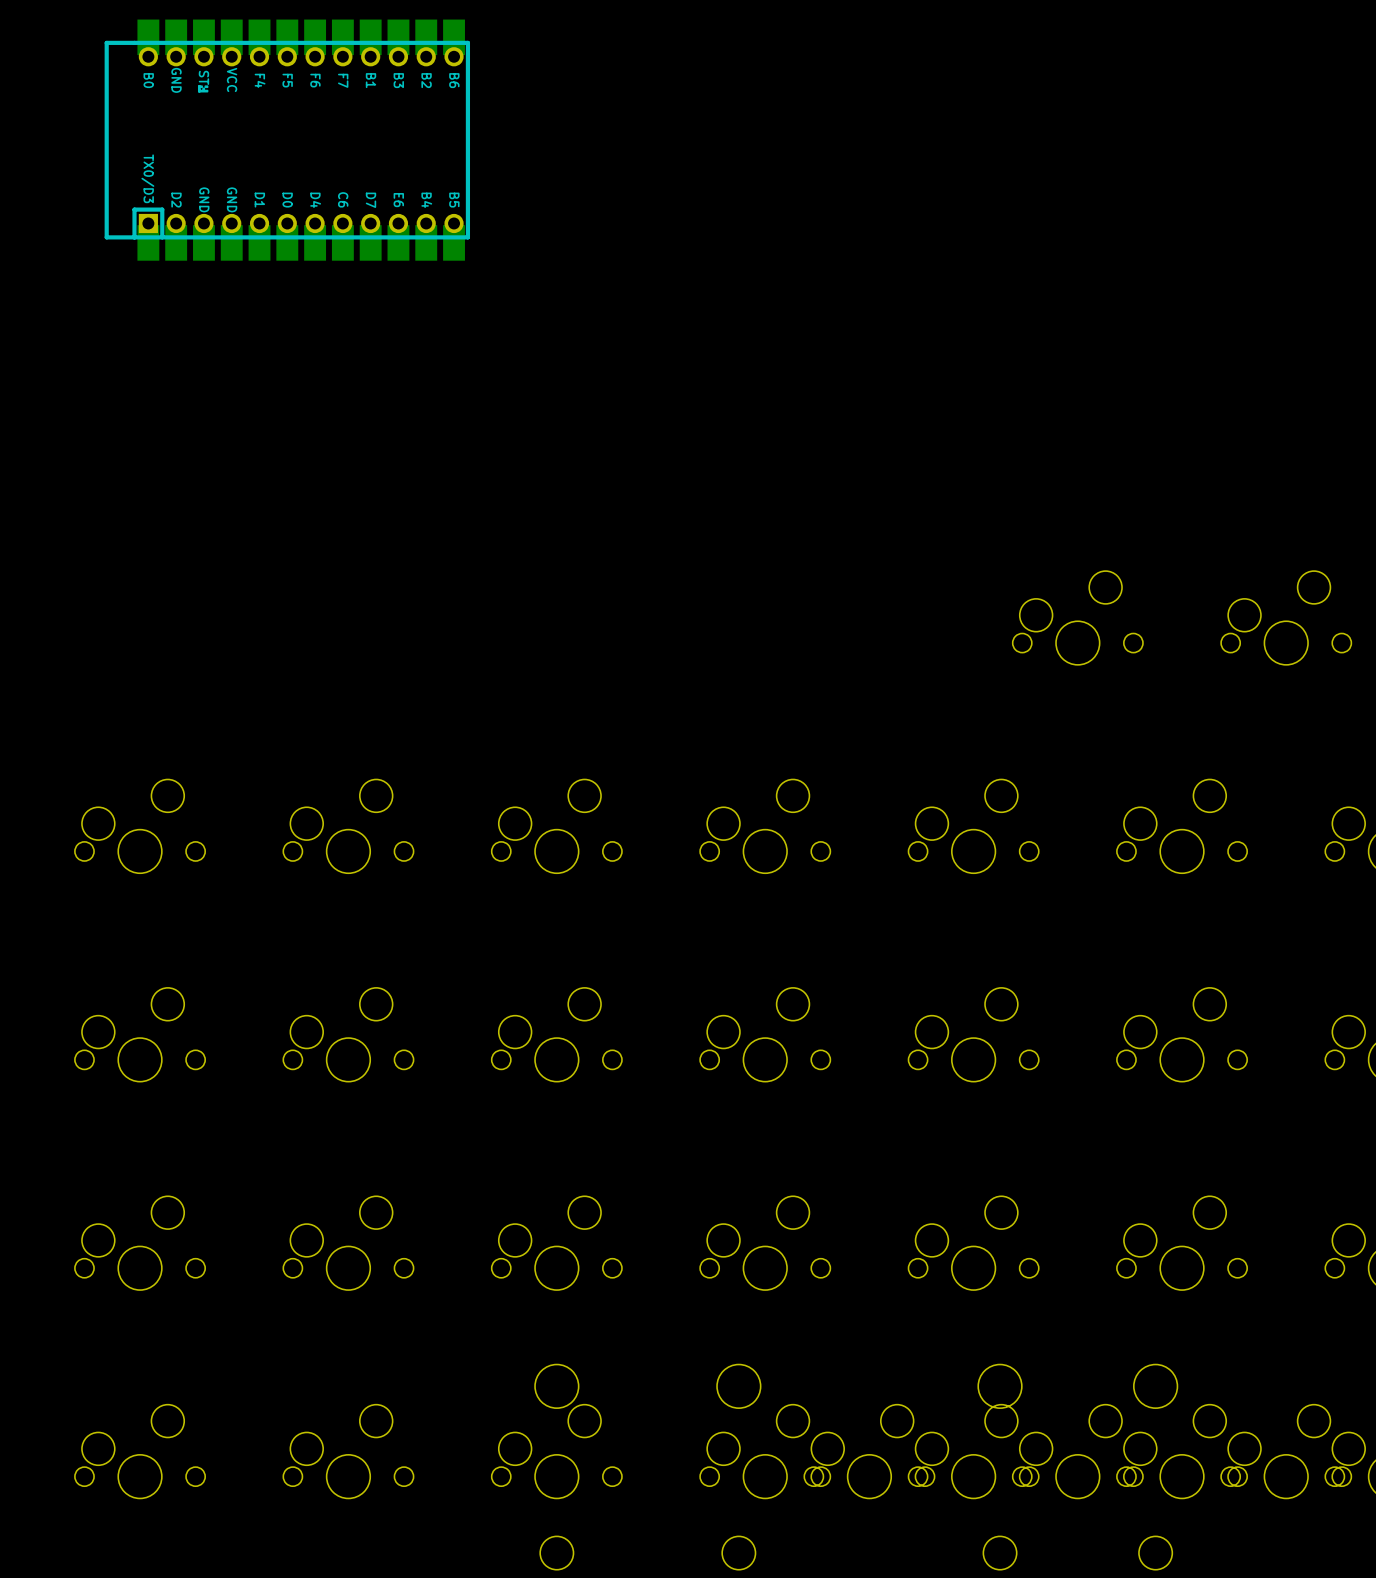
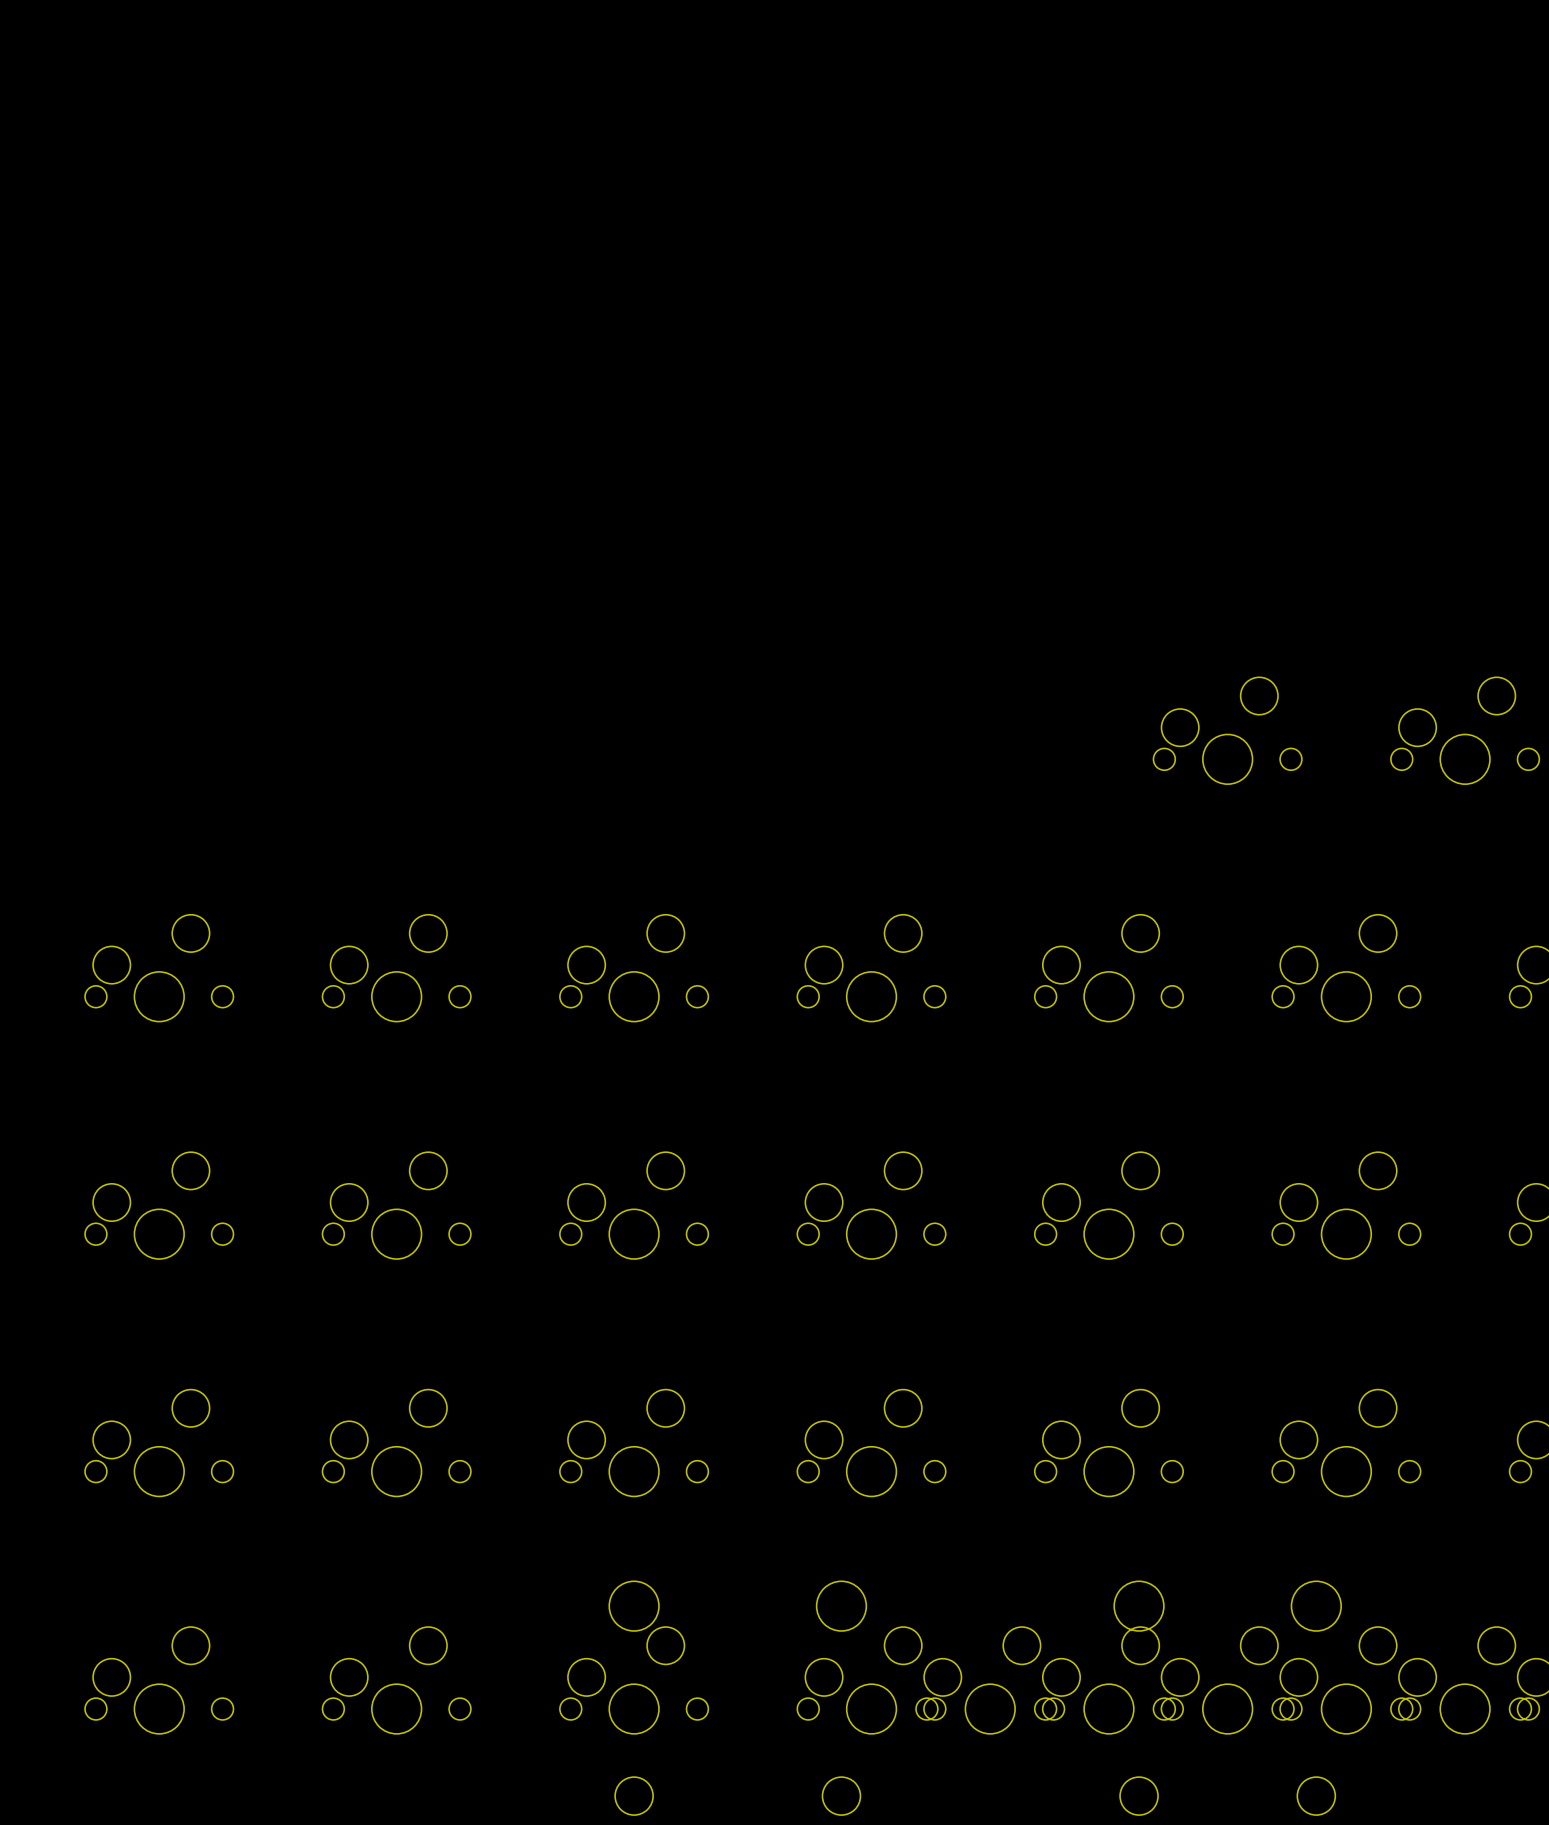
part: (287, 140) -> none

